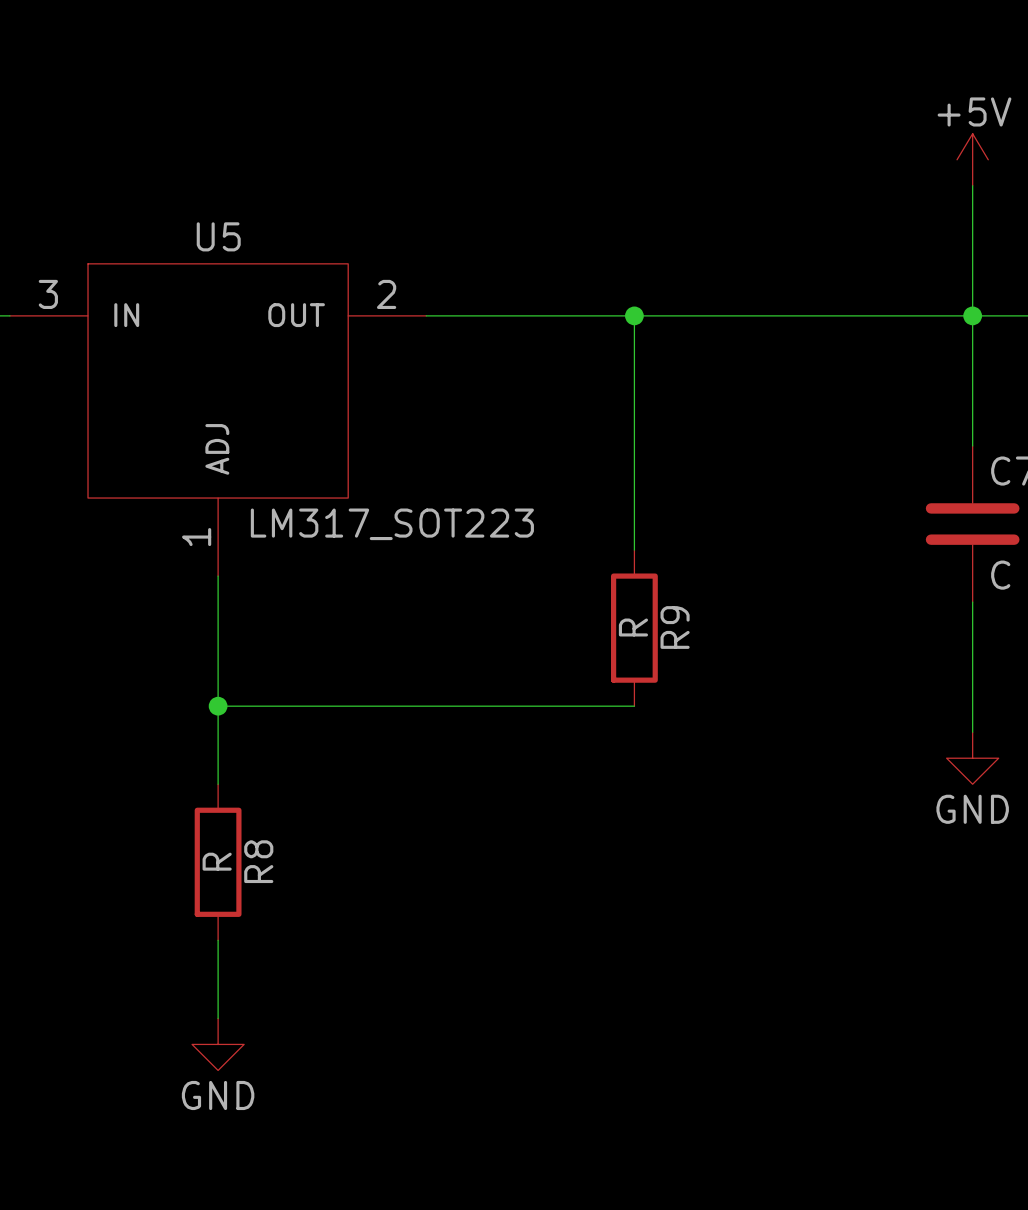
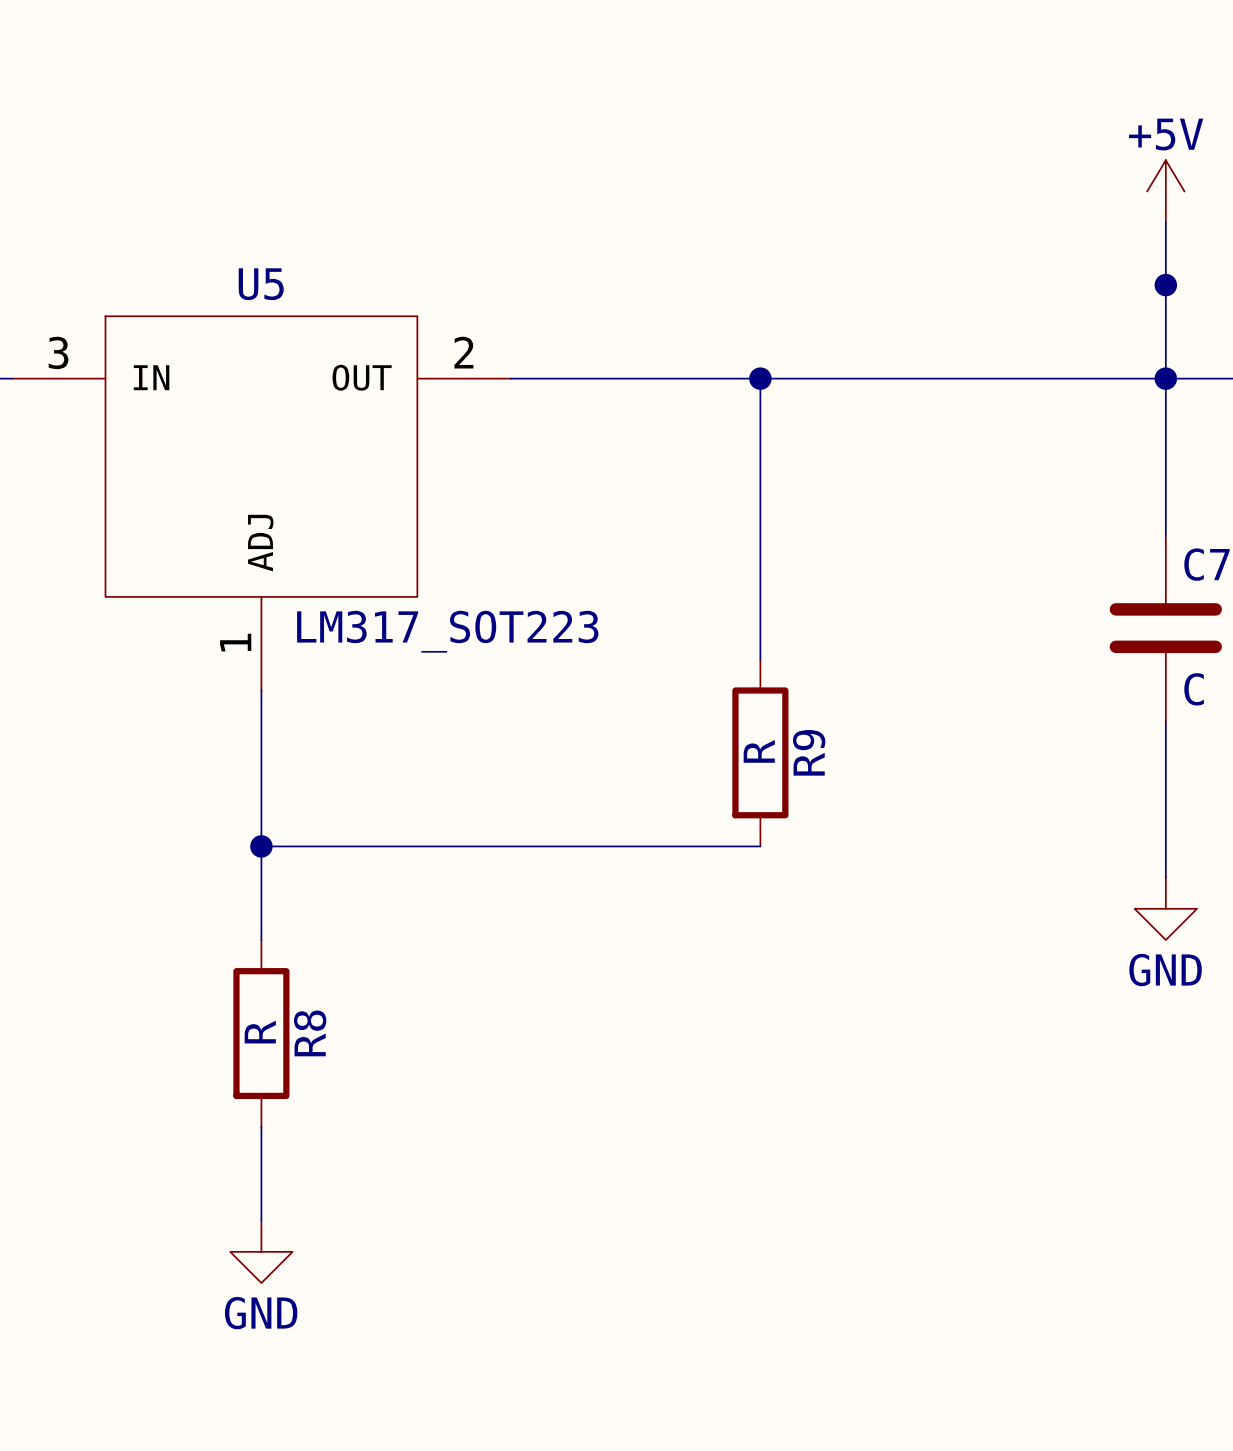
junction: none -> (1165, 285)

